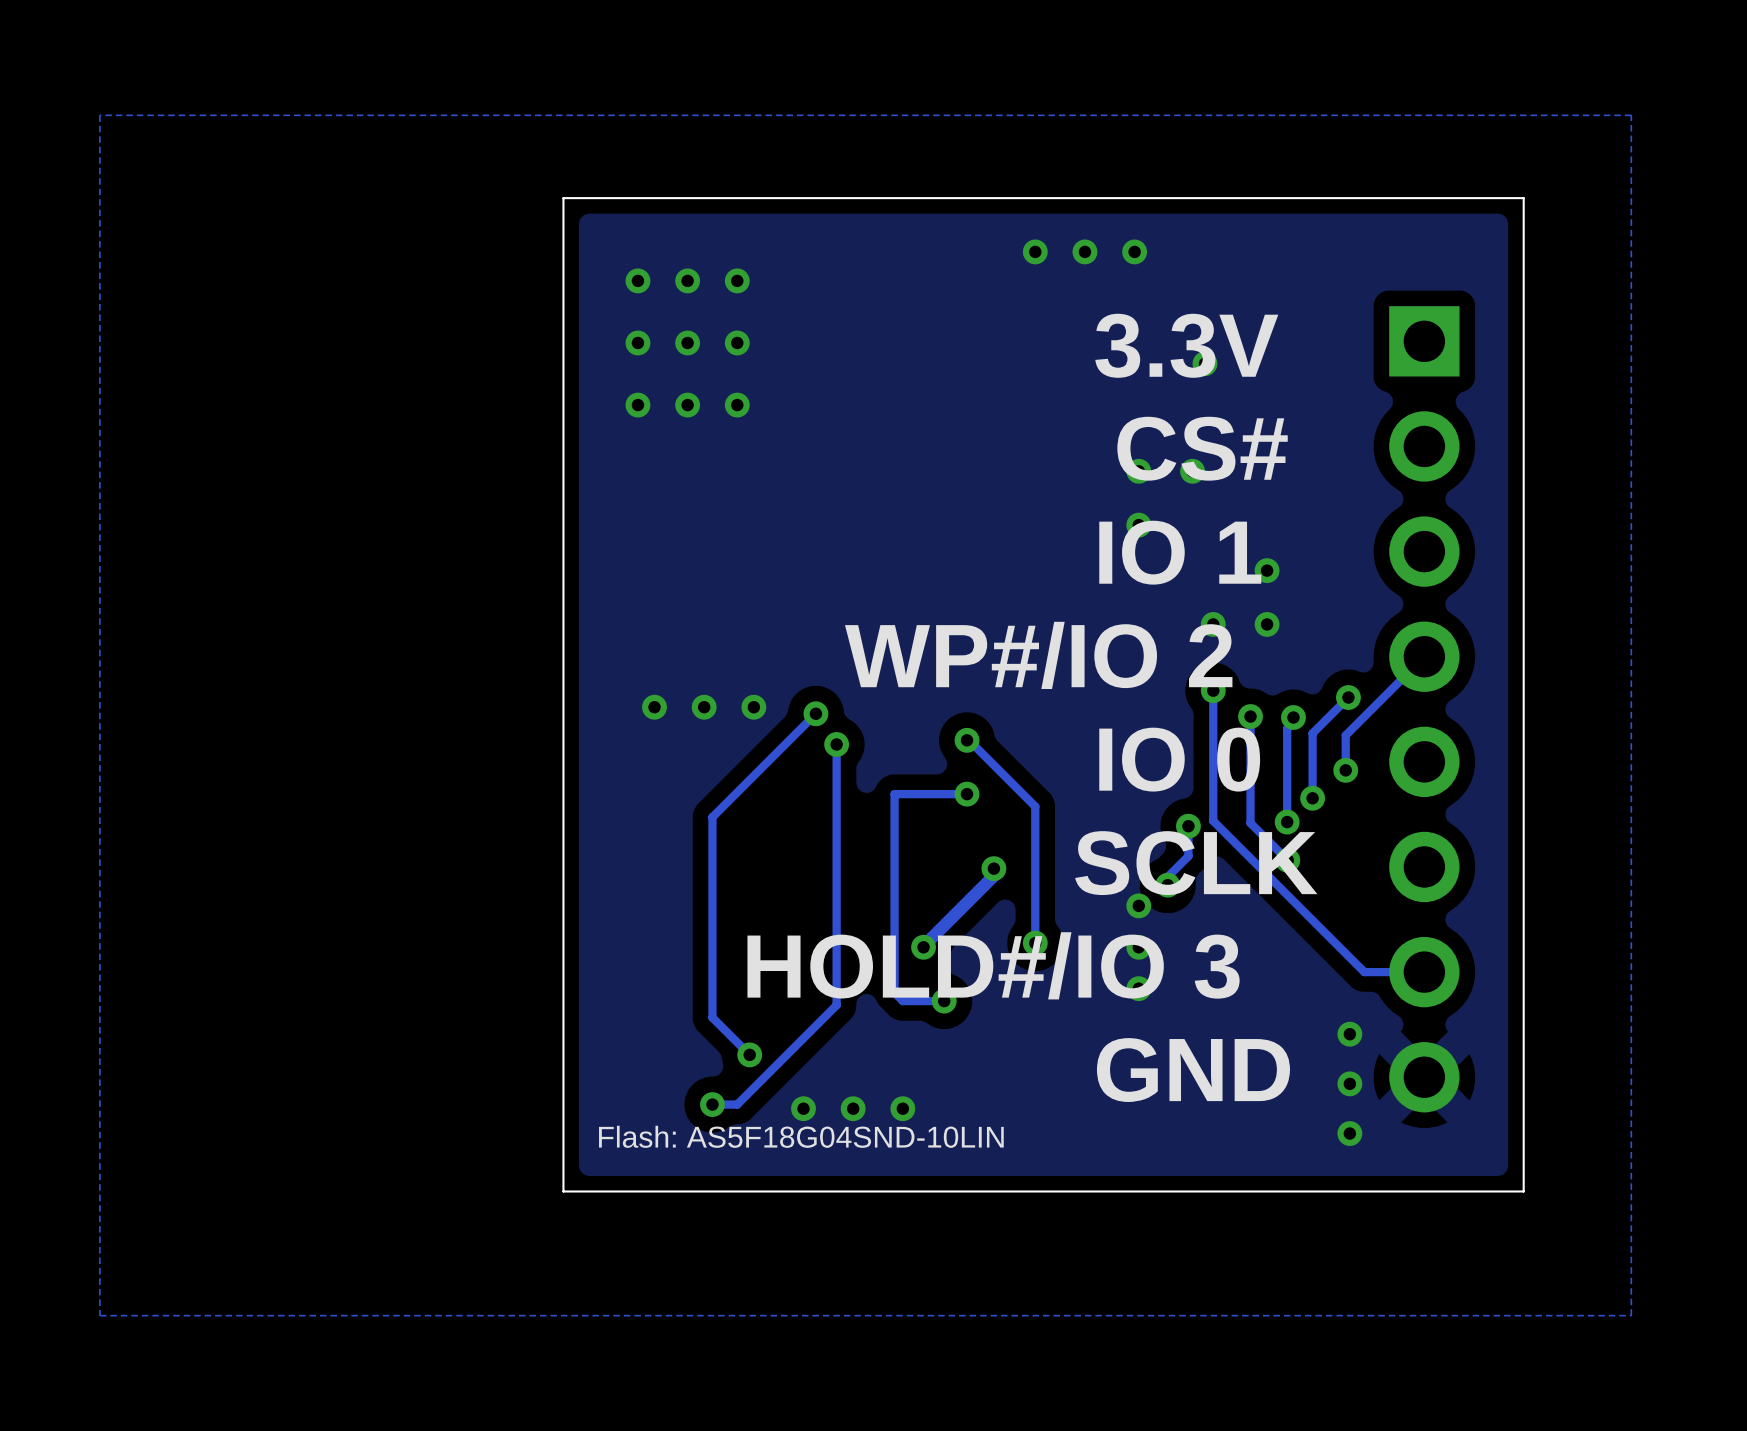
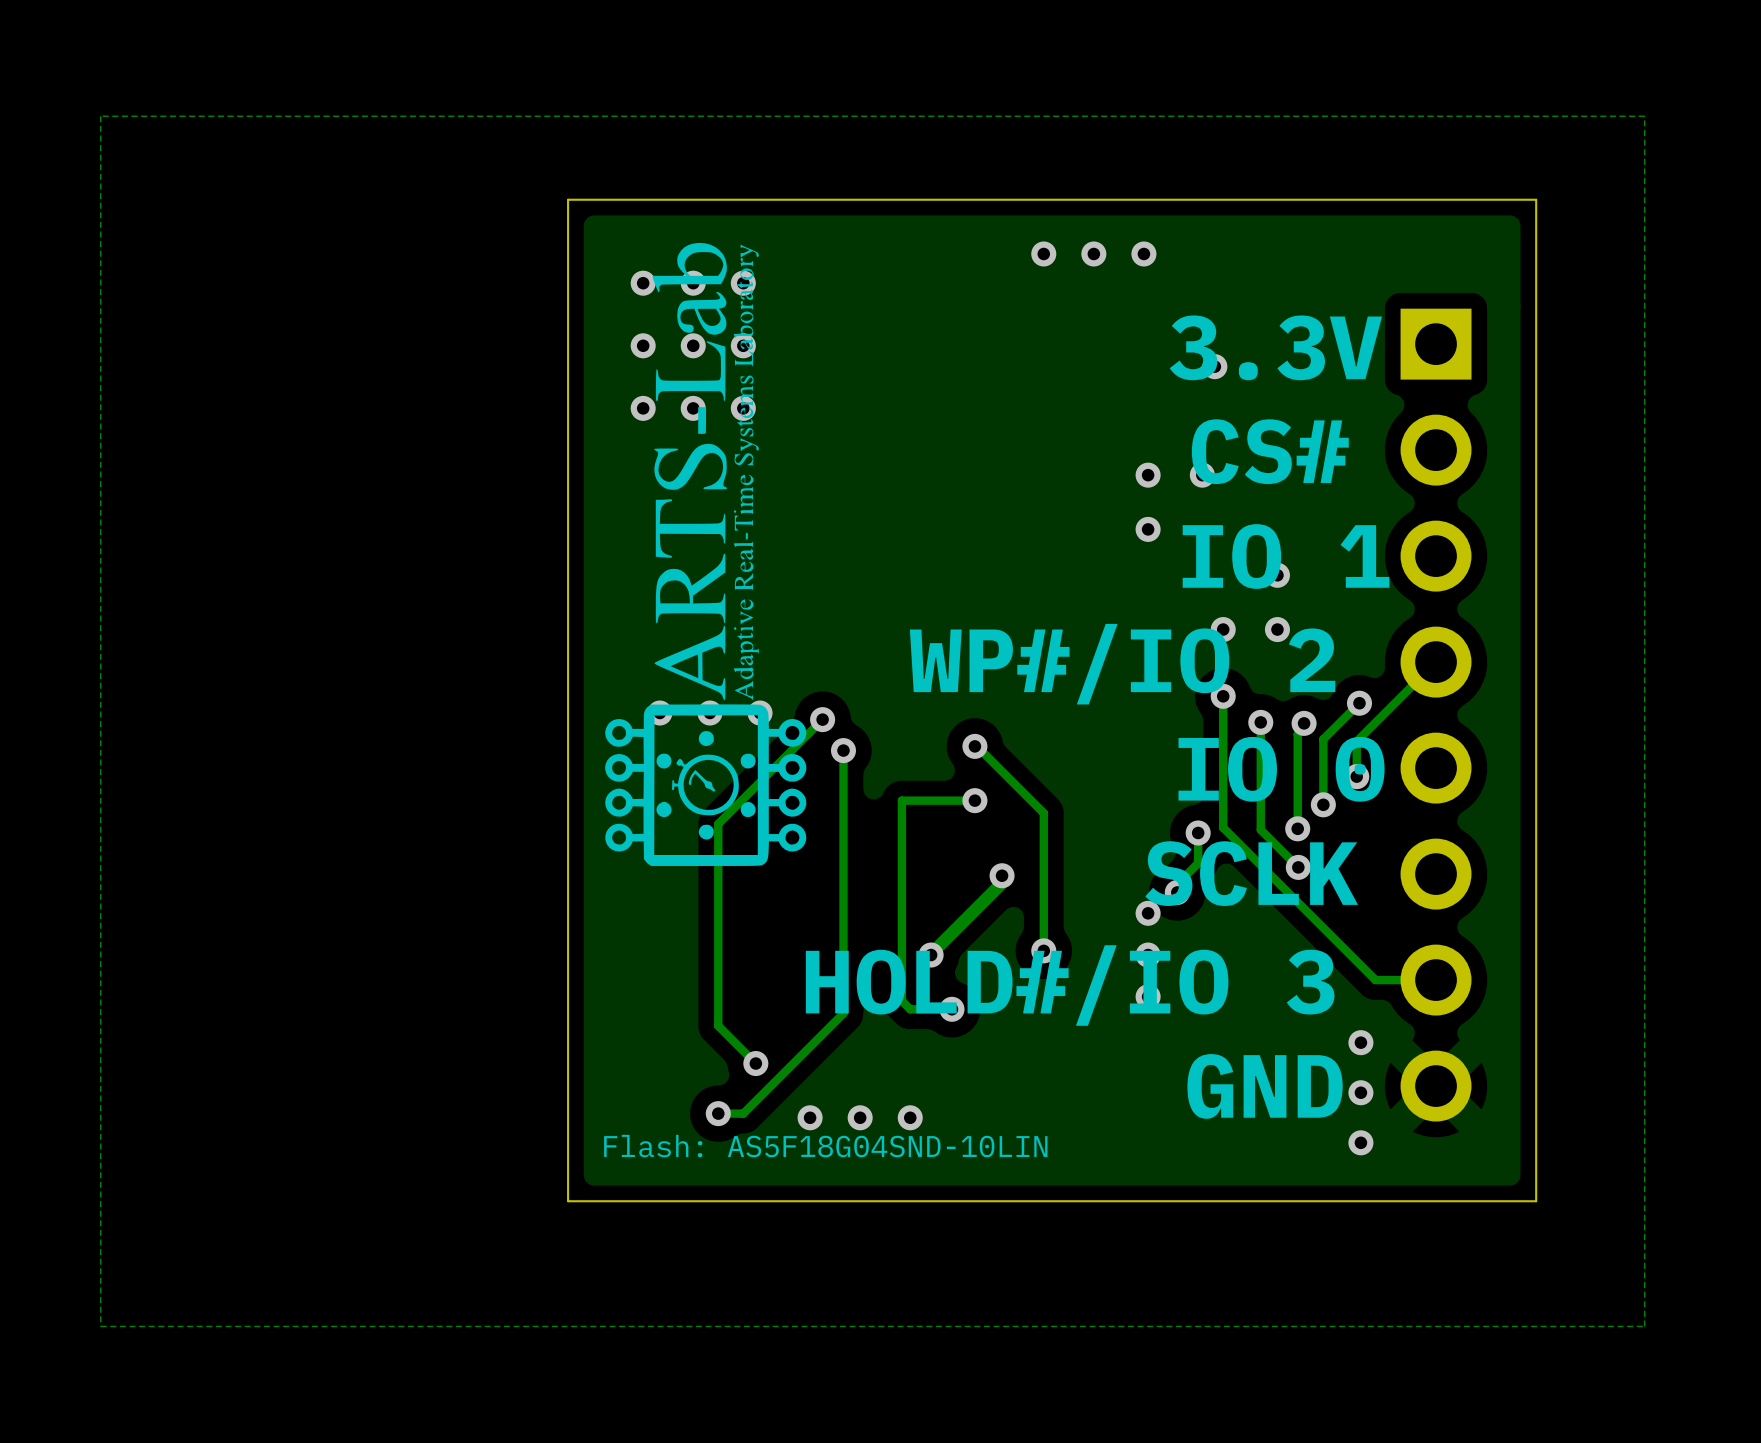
drawing: none -> [605, 242, 807, 866]
text position: 3.3V (1186, 345) -> 3.3V (1275, 347)
text position: CS# (1202, 448) -> CS# (1270, 451)
text position: IO 1 (1180, 552) -> IO 1 (1286, 556)
text position: WP#/IO 2 (1038, 655) -> WP#/IO 2 (1122, 664)
text position: IO 0 (1179, 759) -> IO 0 (1281, 769)
text position: SCLK (1196, 863) -> SCLK (1251, 873)
text position: HOLD#/IO 3 (993, 965) -> HOLD#/IO 3 (1070, 985)
text position: GND (1193, 1070) -> GND (1265, 1086)

